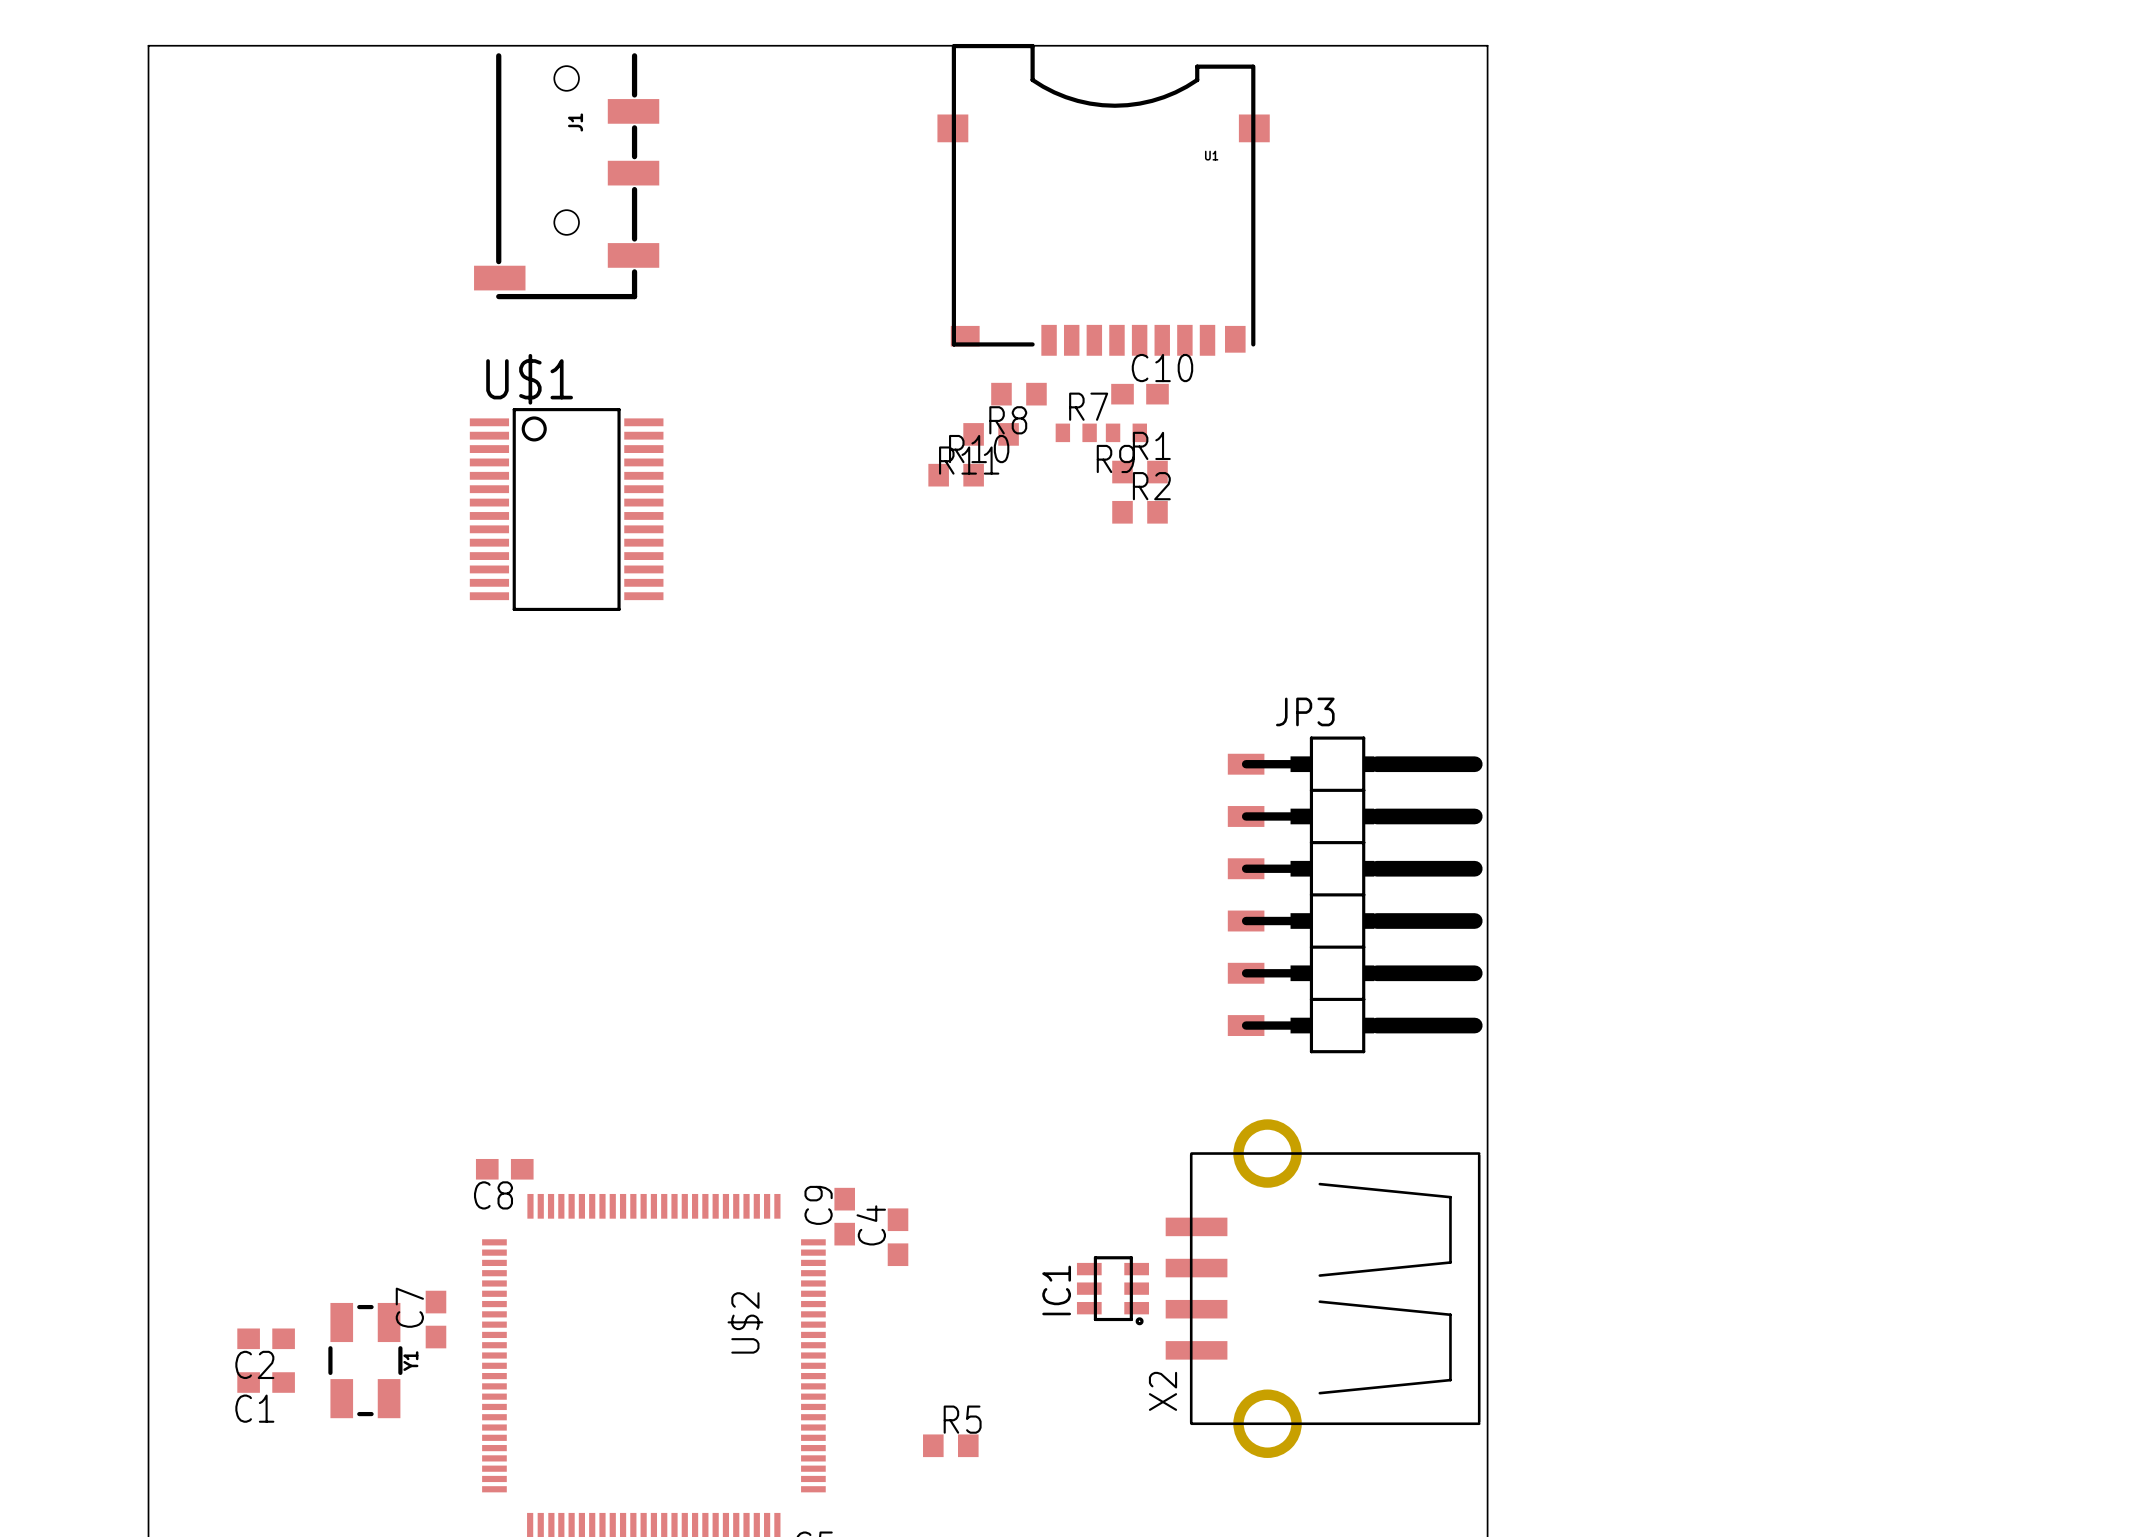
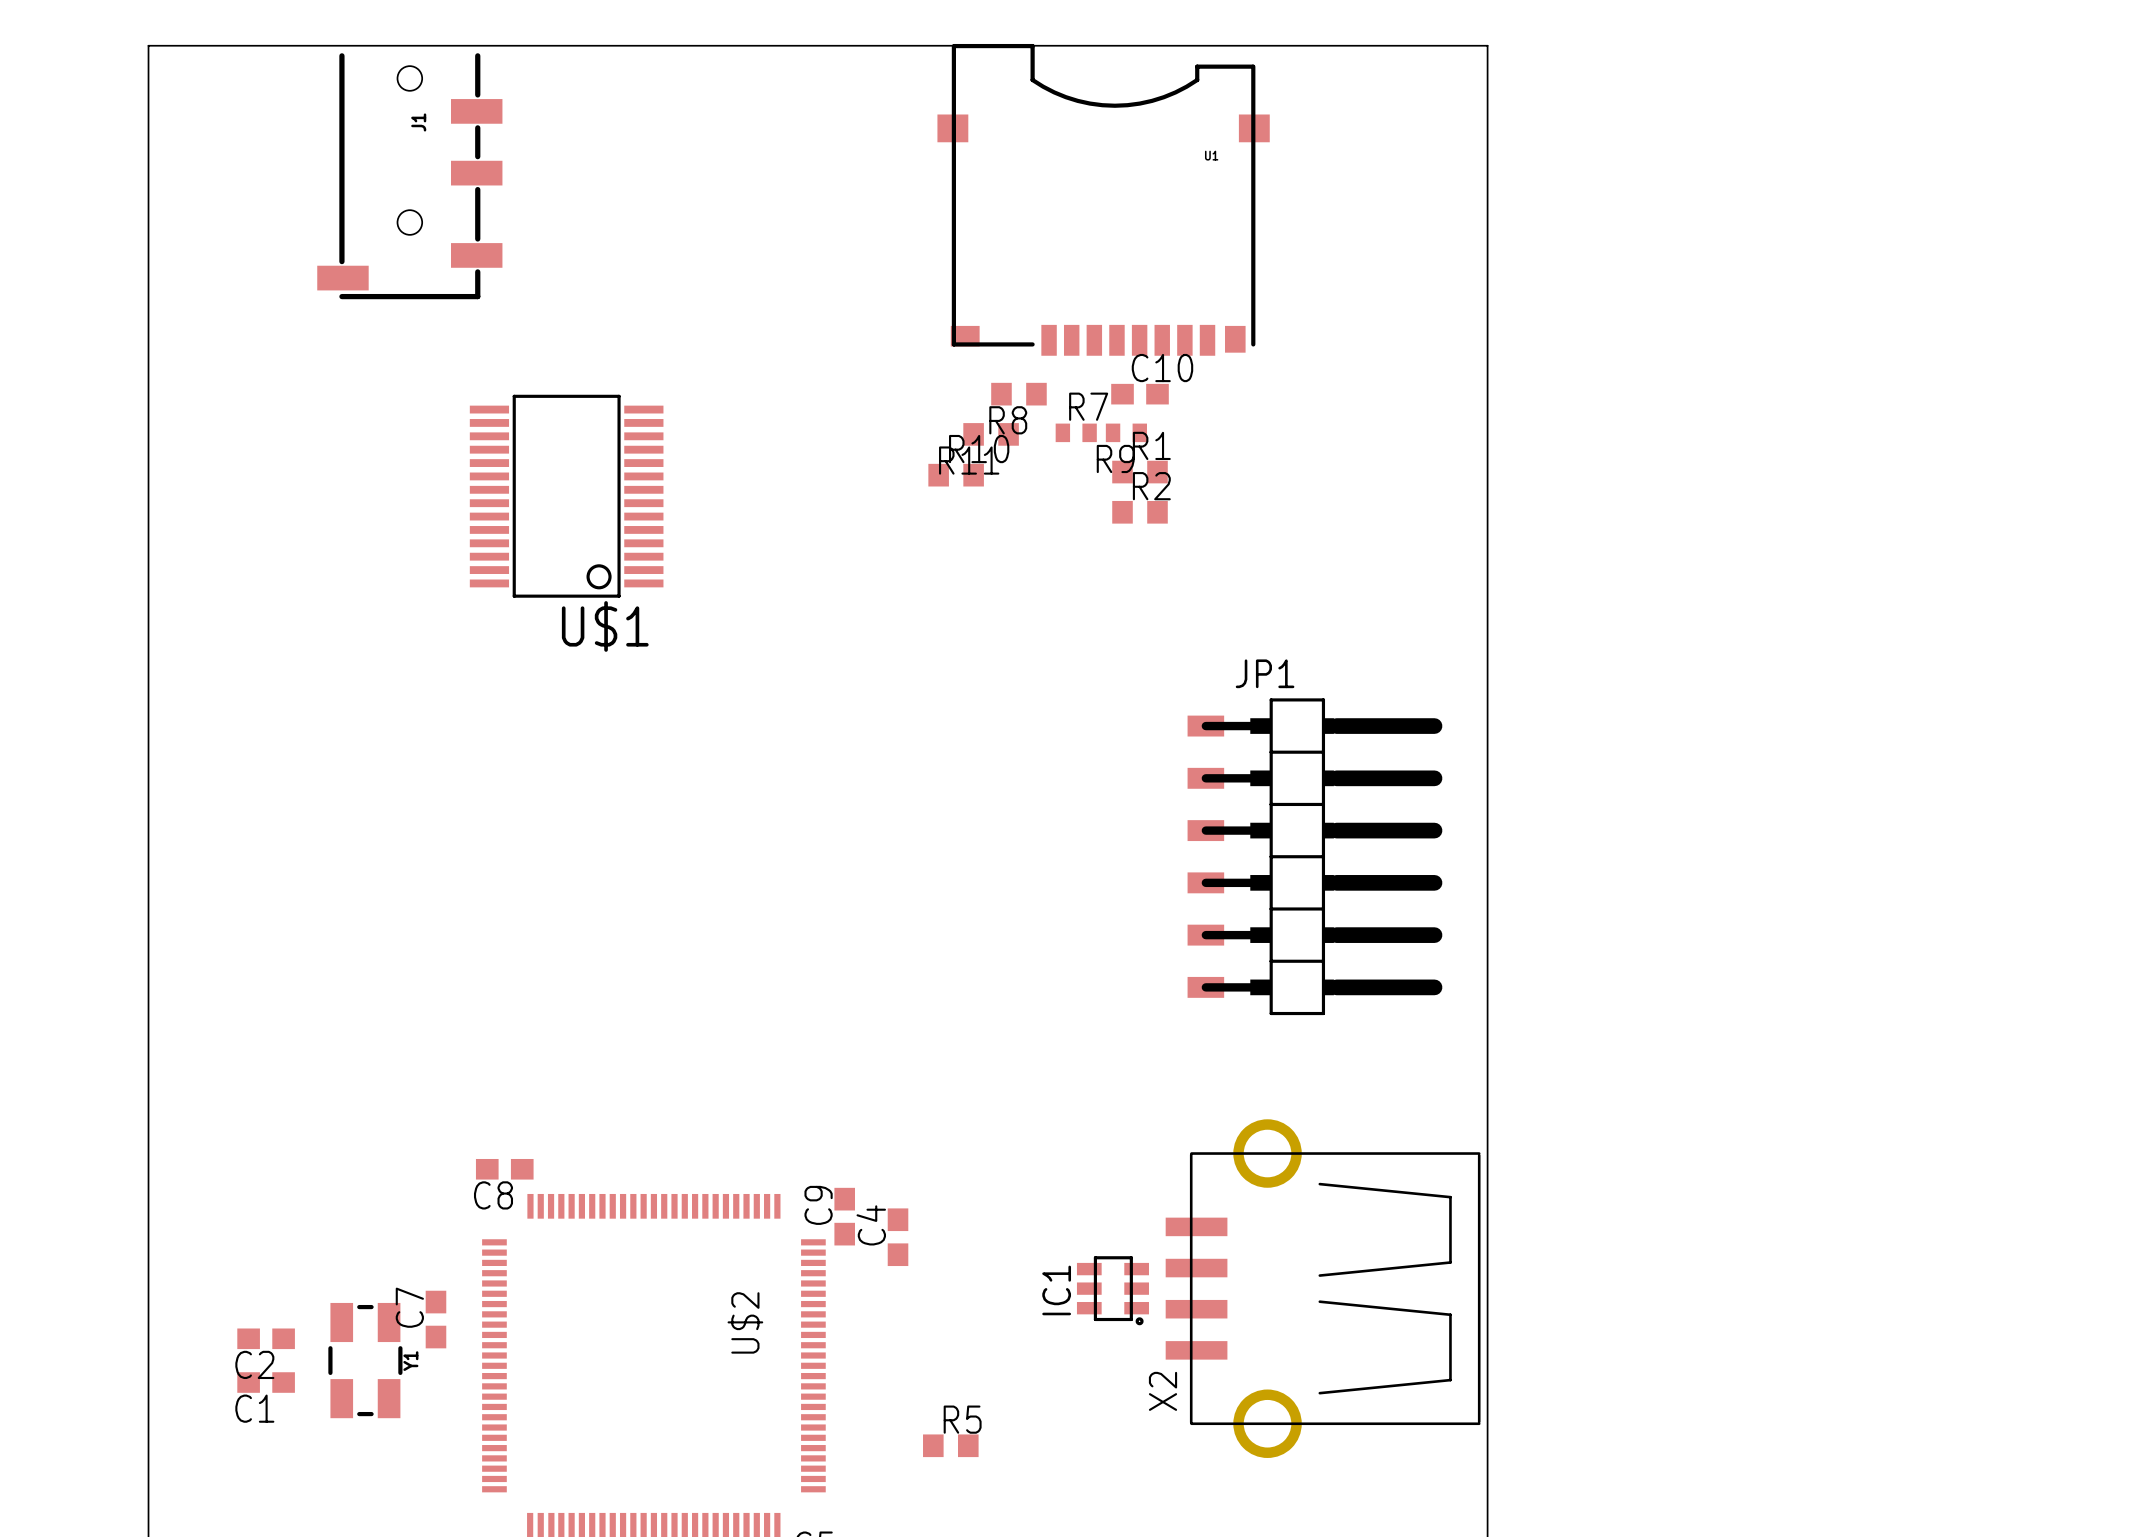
J1 position: (566, 176) -> (409, 176)
U$1 rotation: 0° (566, 509) -> 180° (566, 496)
JP1: none -> (1314, 856)
JP3: (1355, 894) -> none

